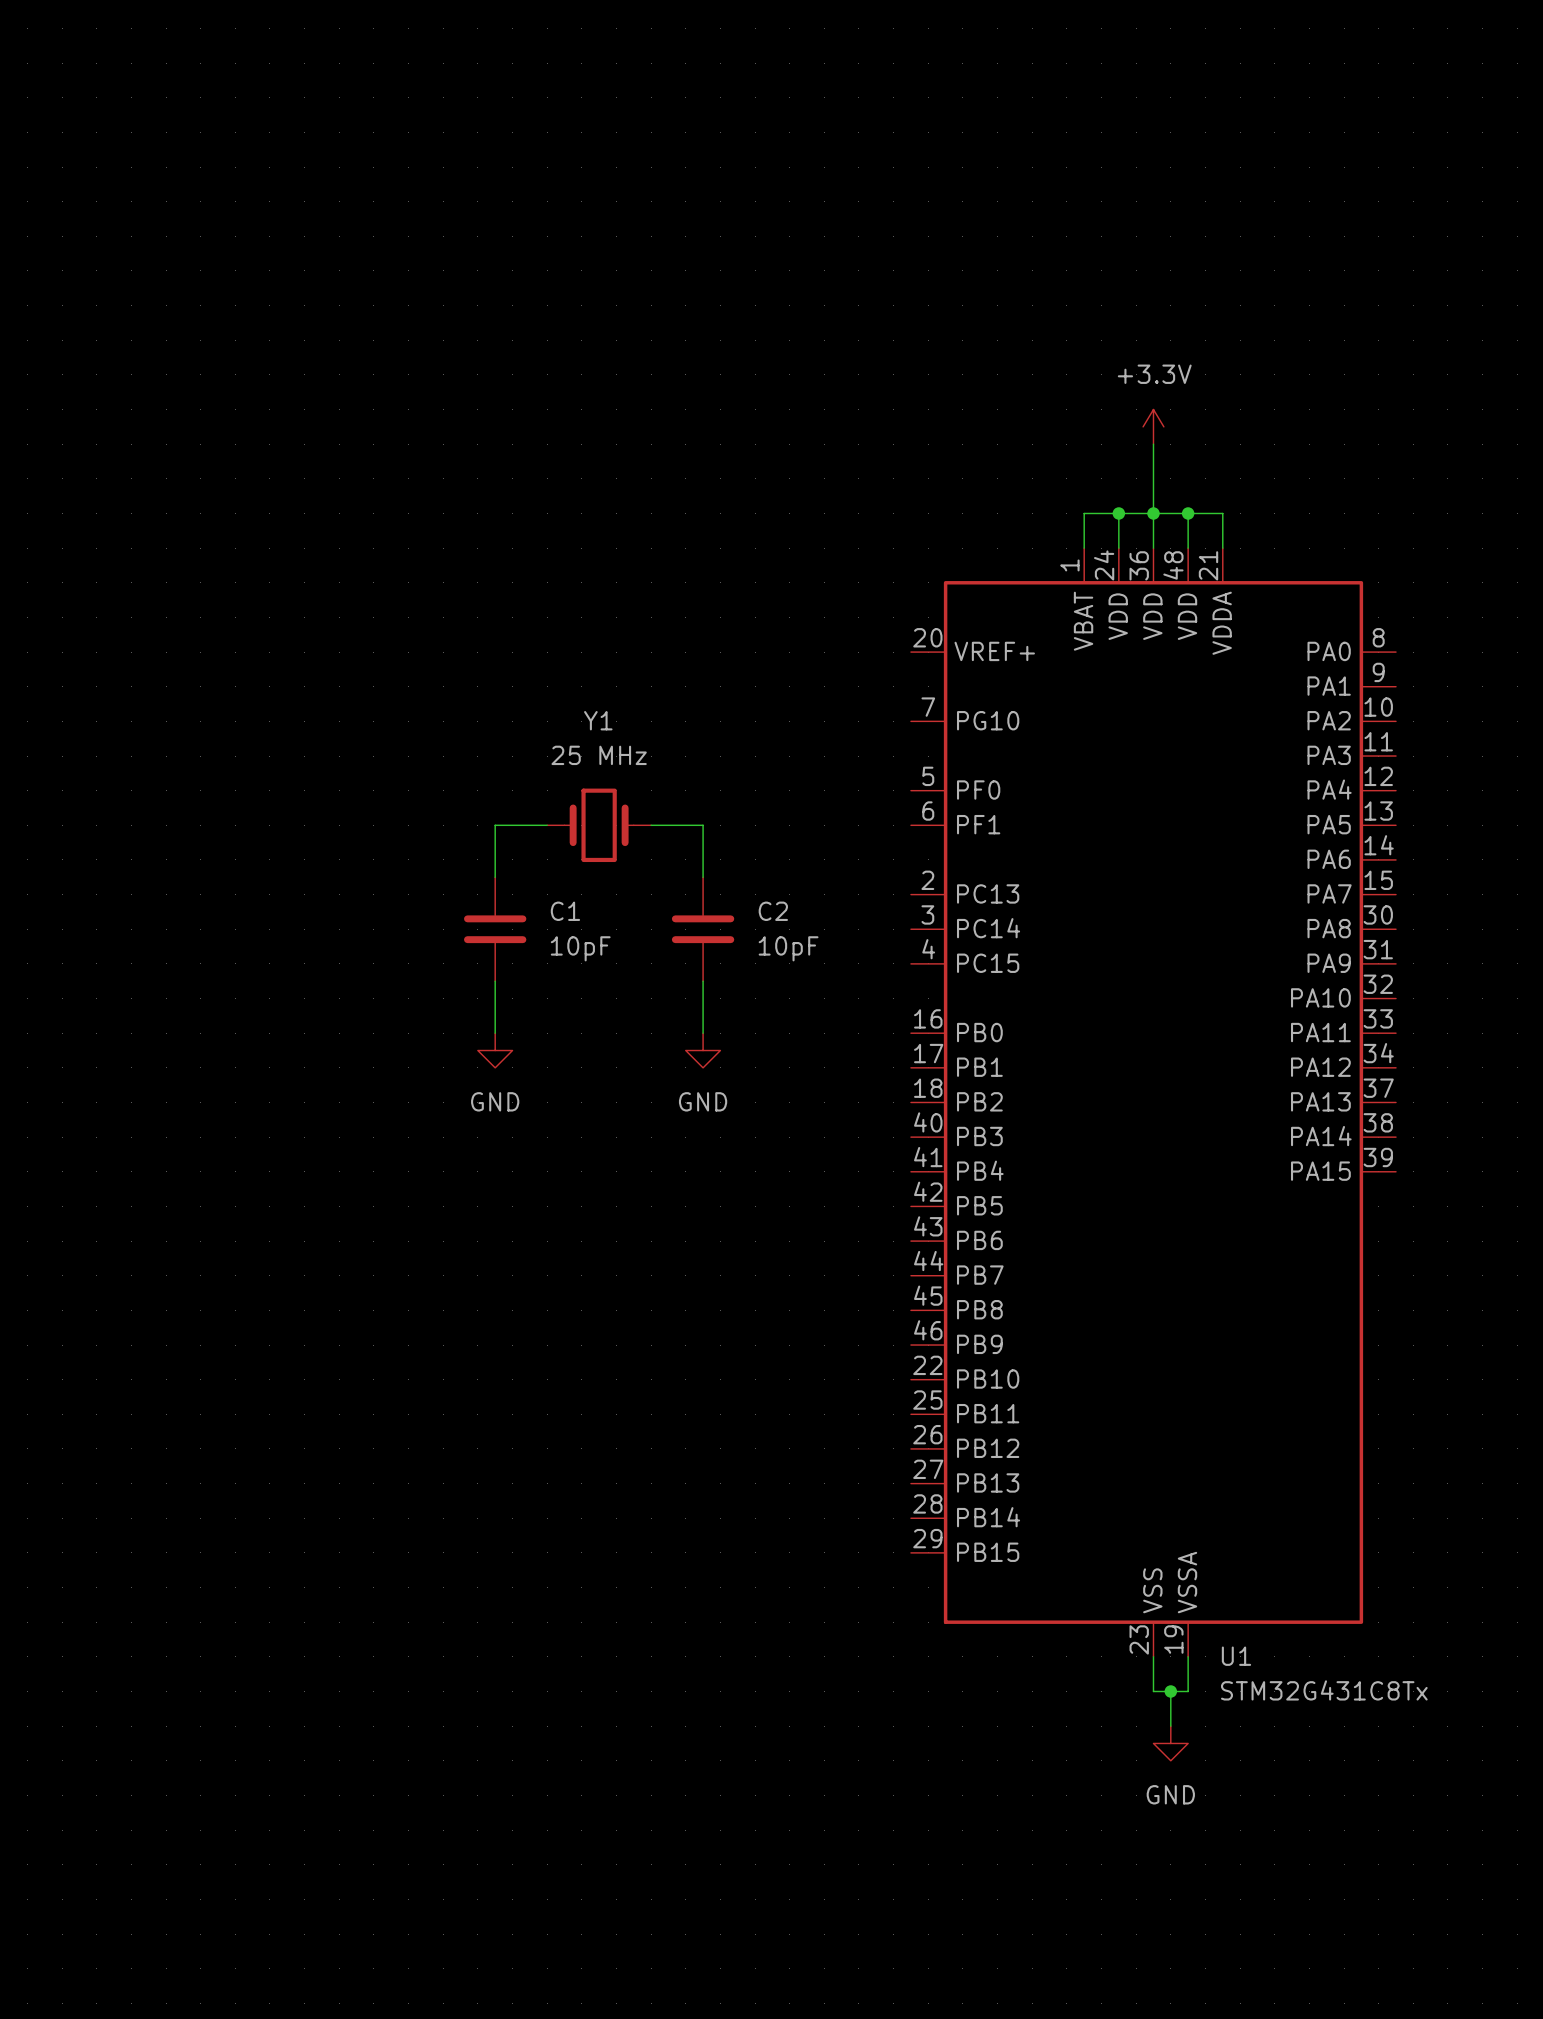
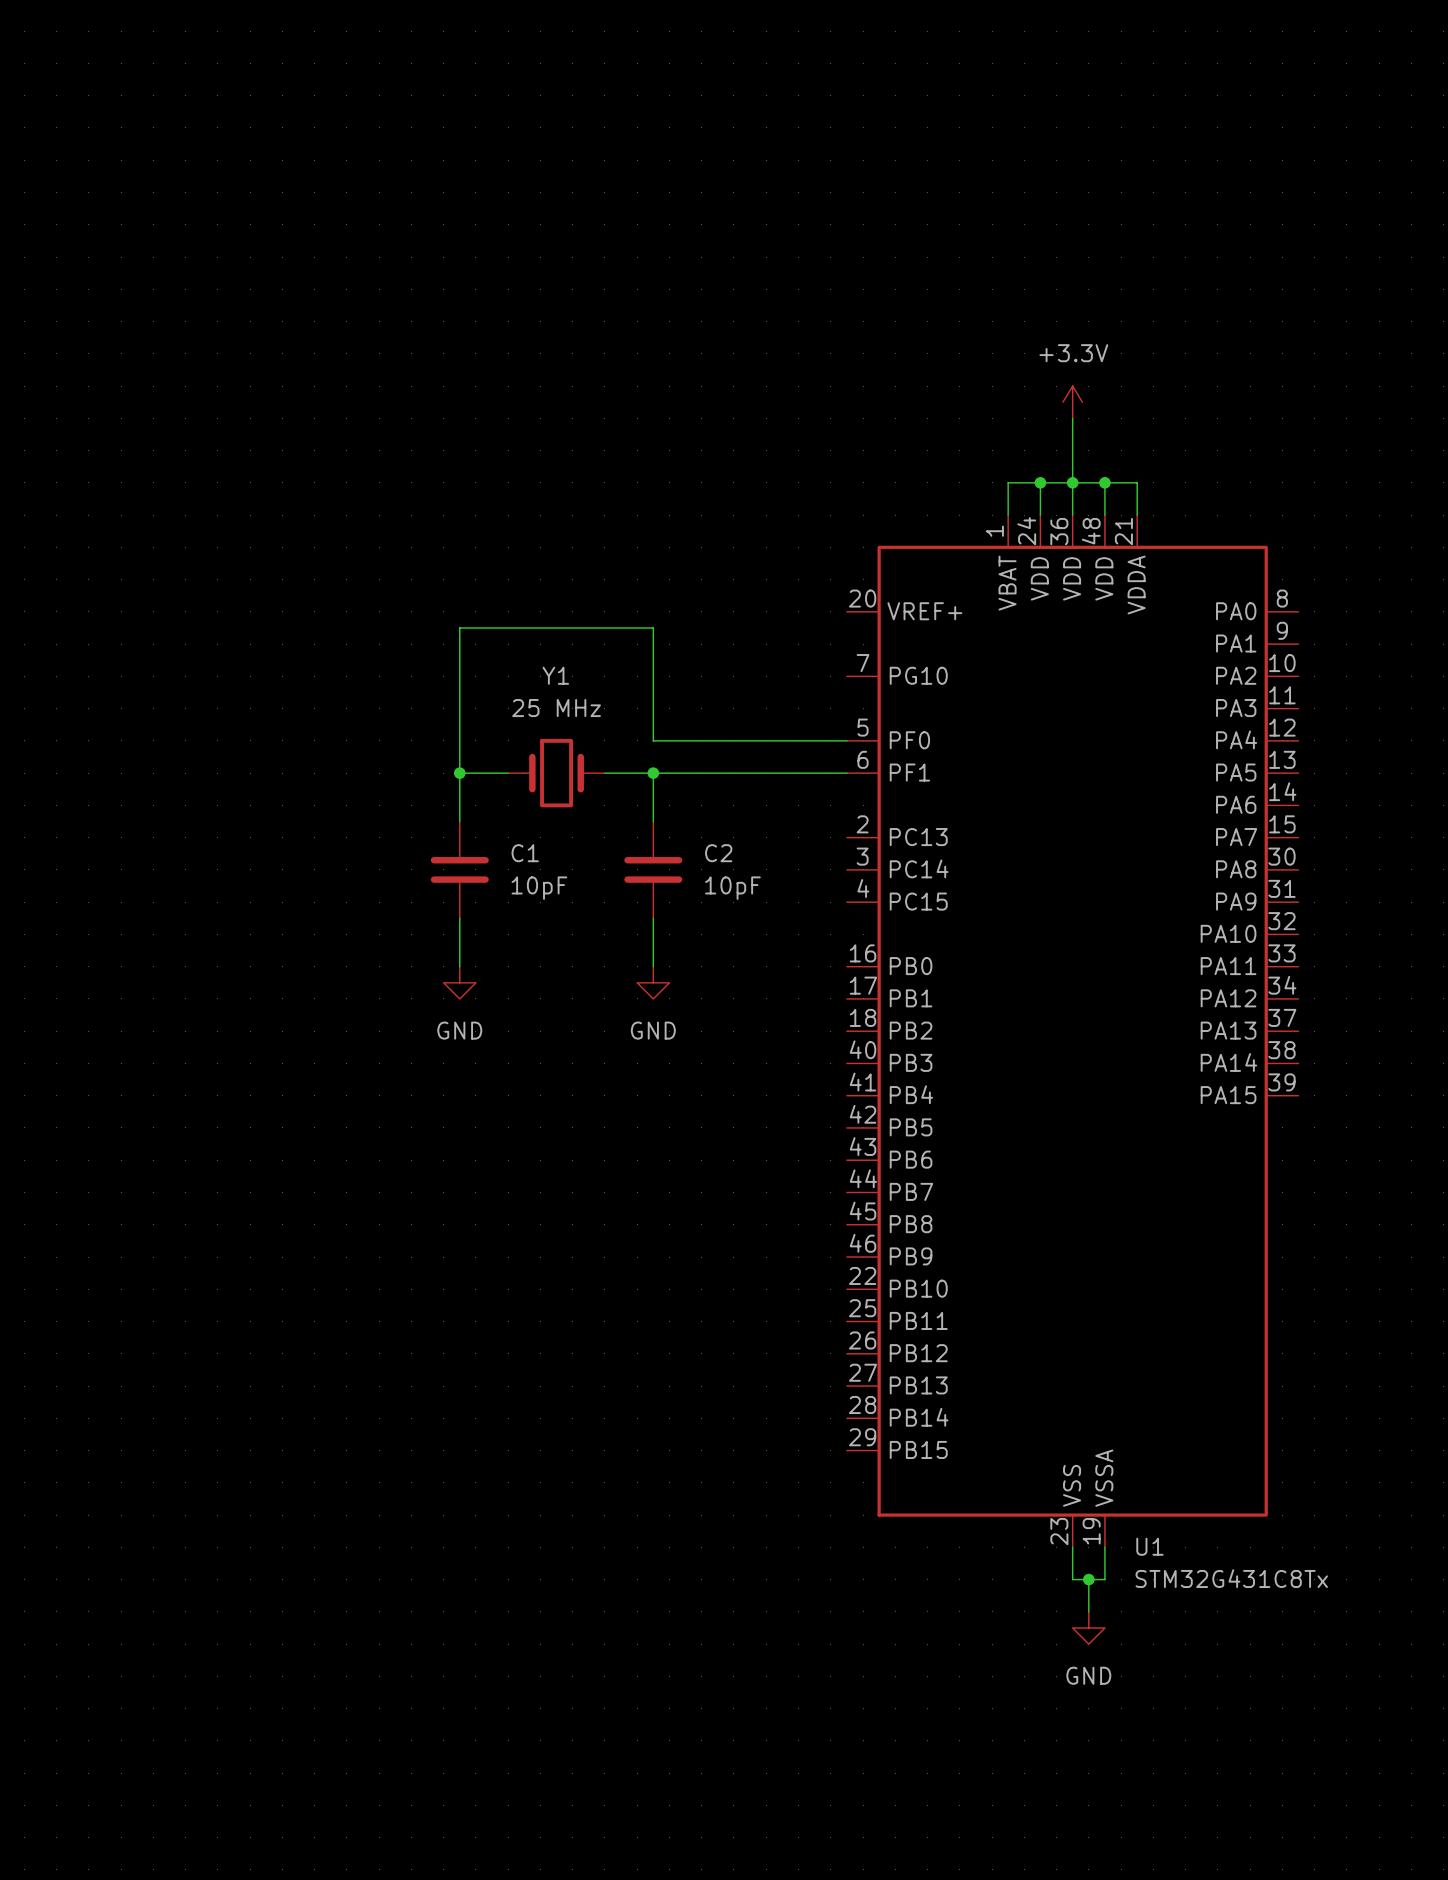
wire: none -> (846, 740) (653, 740) (653, 627) (459, 627) (459, 773)
junction: none -> (459, 773)
wire: none -> (653, 773) (846, 773)
junction: none -> (653, 773)

